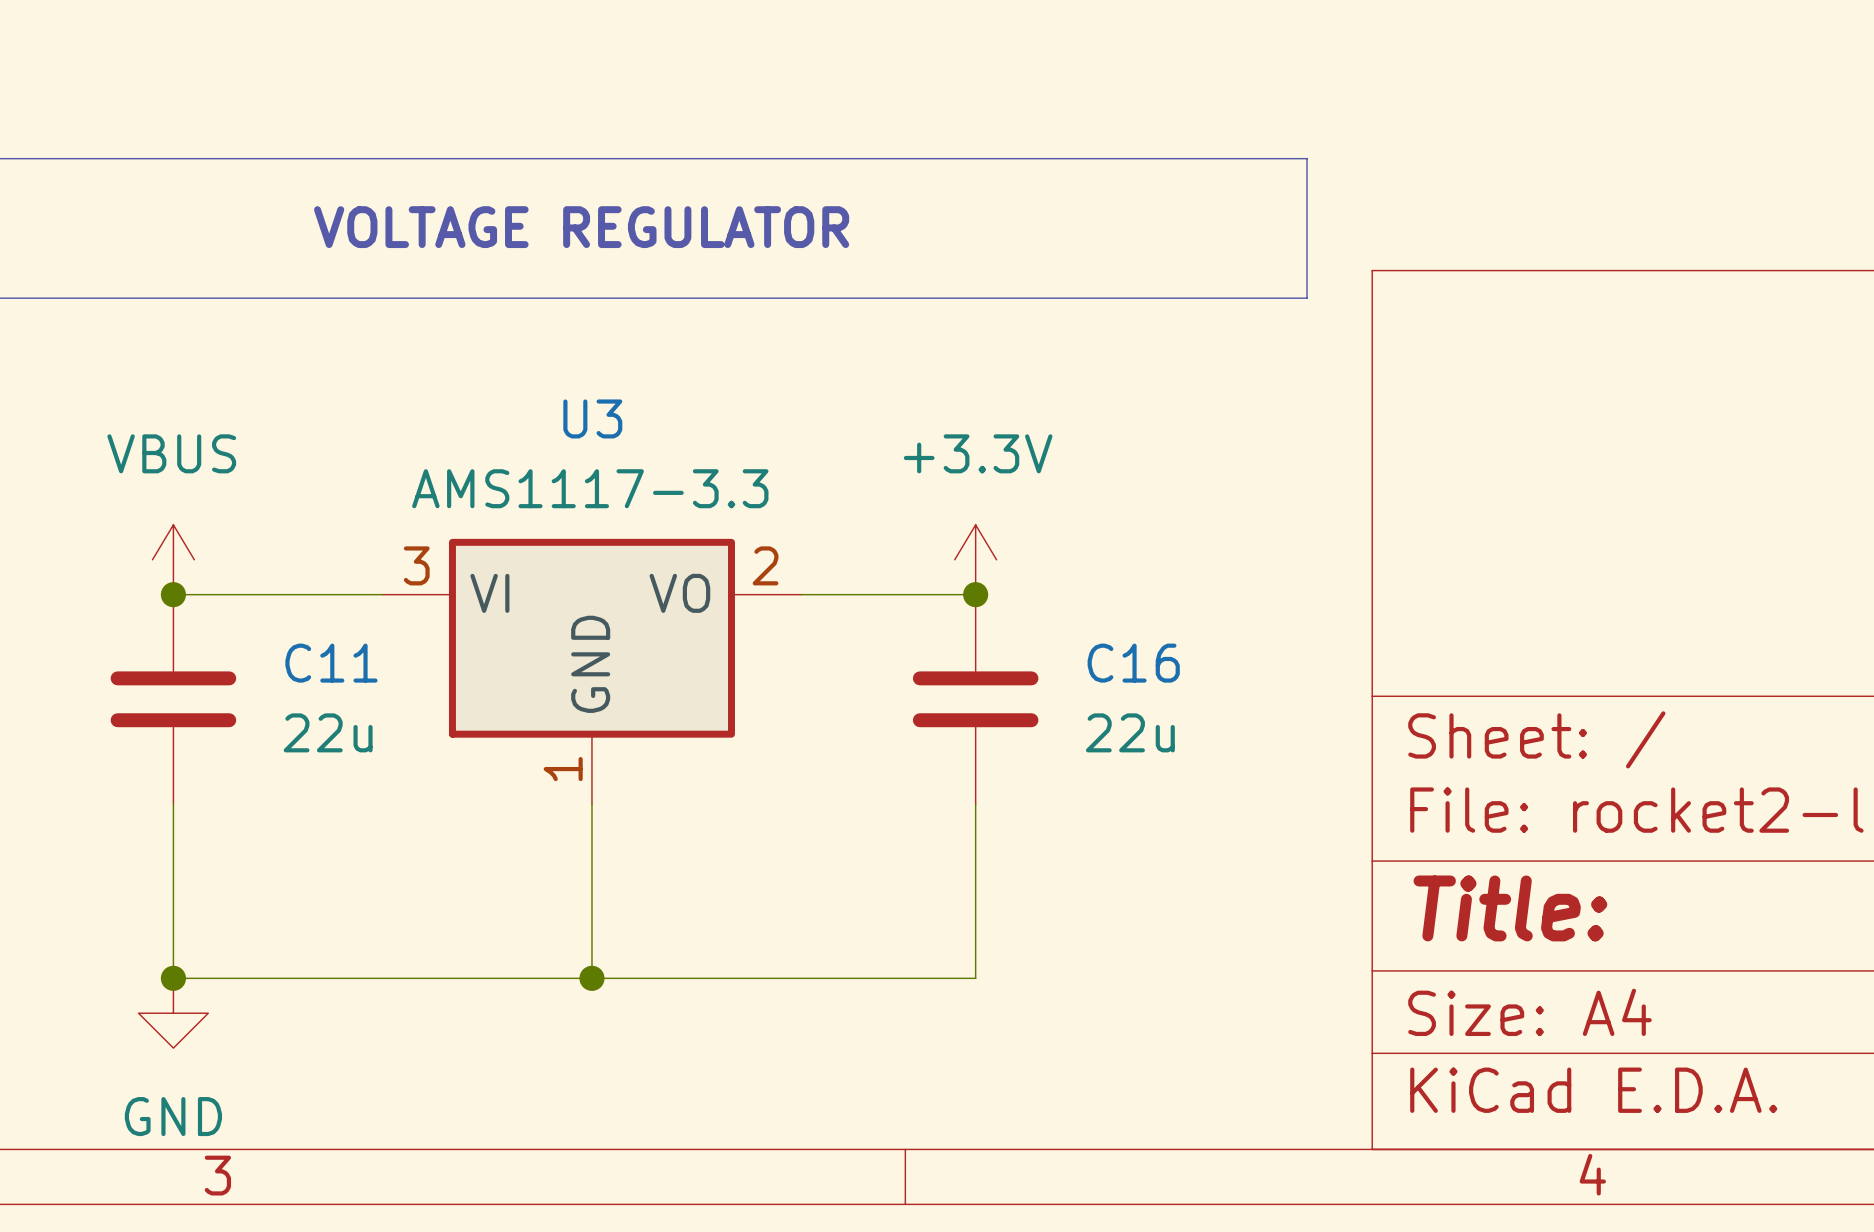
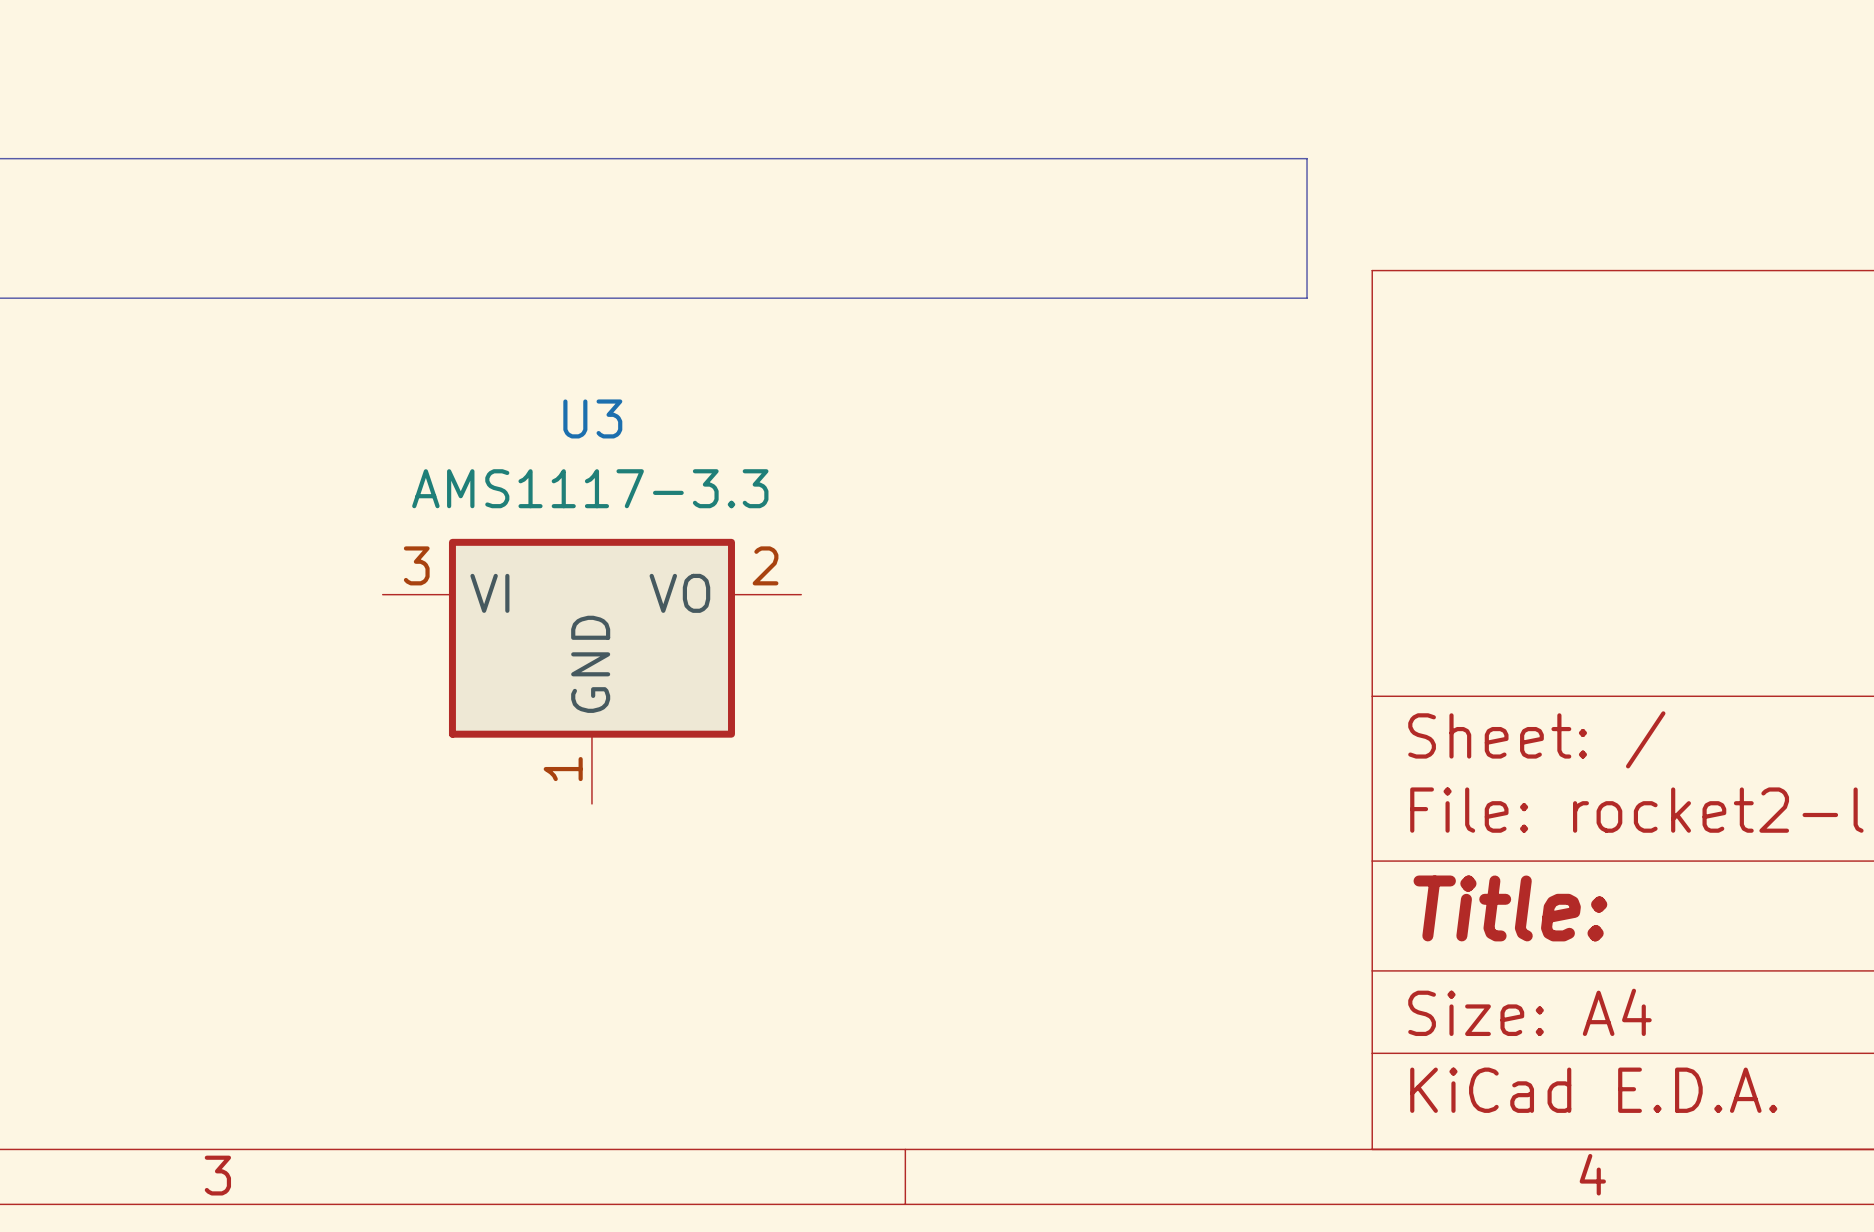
text: VOLTAGE REGULATOR (581, 227) -> none
power symbol: VBUS (173, 559) -> none
power symbol: +3.3V (975, 559) -> none
wire: (173, 594) (382, 594) -> none
junction: (173, 594) -> none
wire: (801, 594) (975, 594) -> none
junction: (975, 594) -> none
C11: 22u (173, 699) -> none
C16: 22u (975, 699) -> none
wire: (173, 803) (173, 978) (975, 978) (975, 803) -> none
wire: (591, 803) (591, 978) -> none
junction: (173, 978) -> none
junction: (591, 978) -> none
power symbol: GND (173, 1013) -> none

